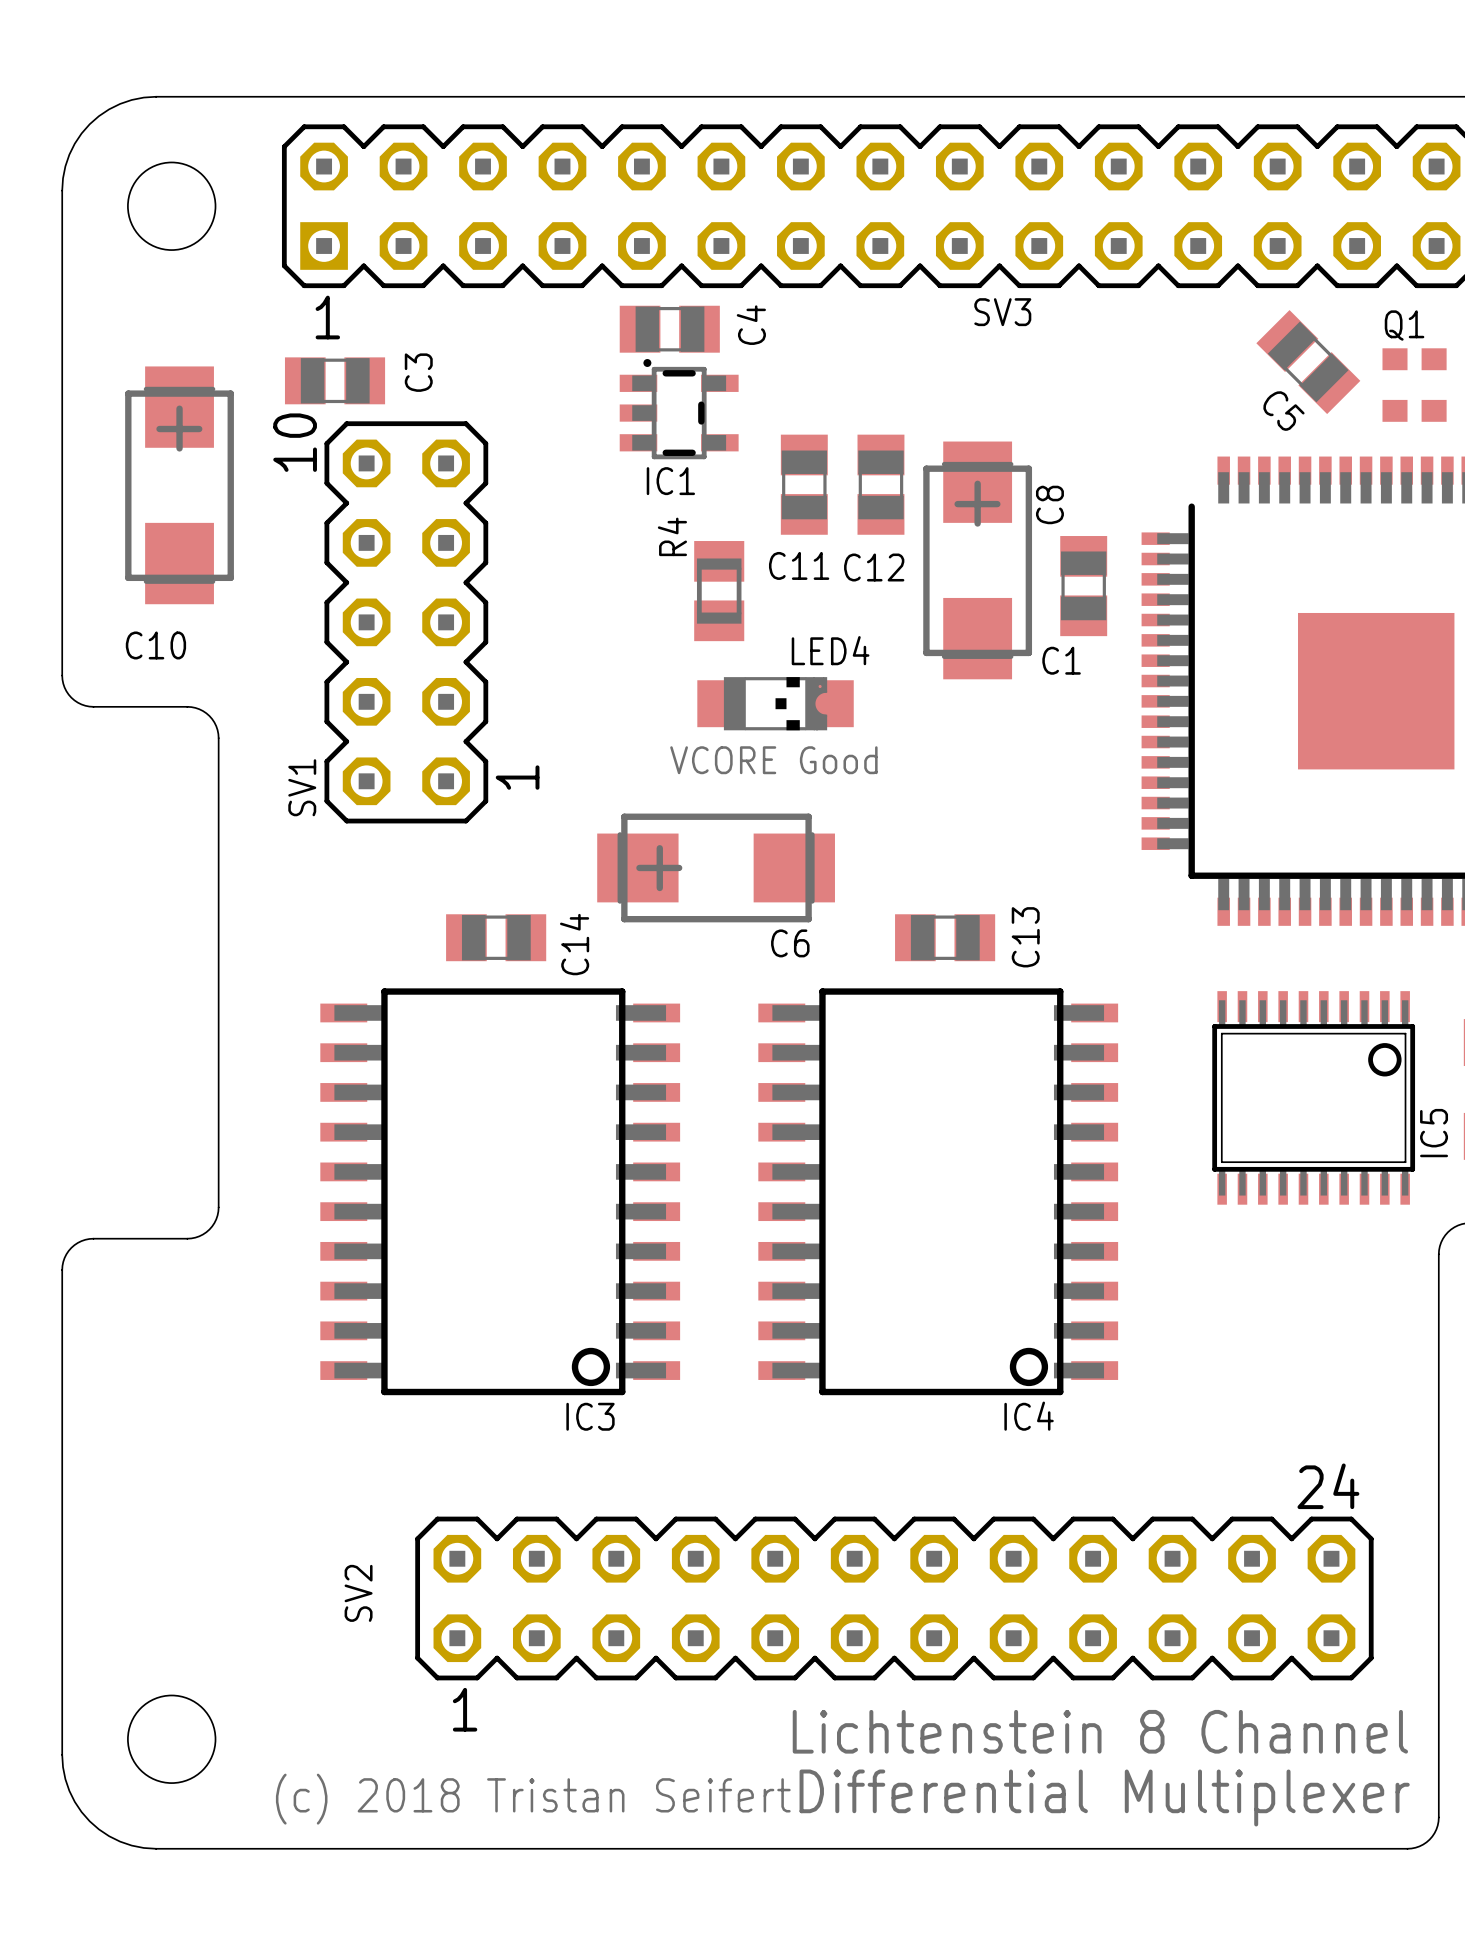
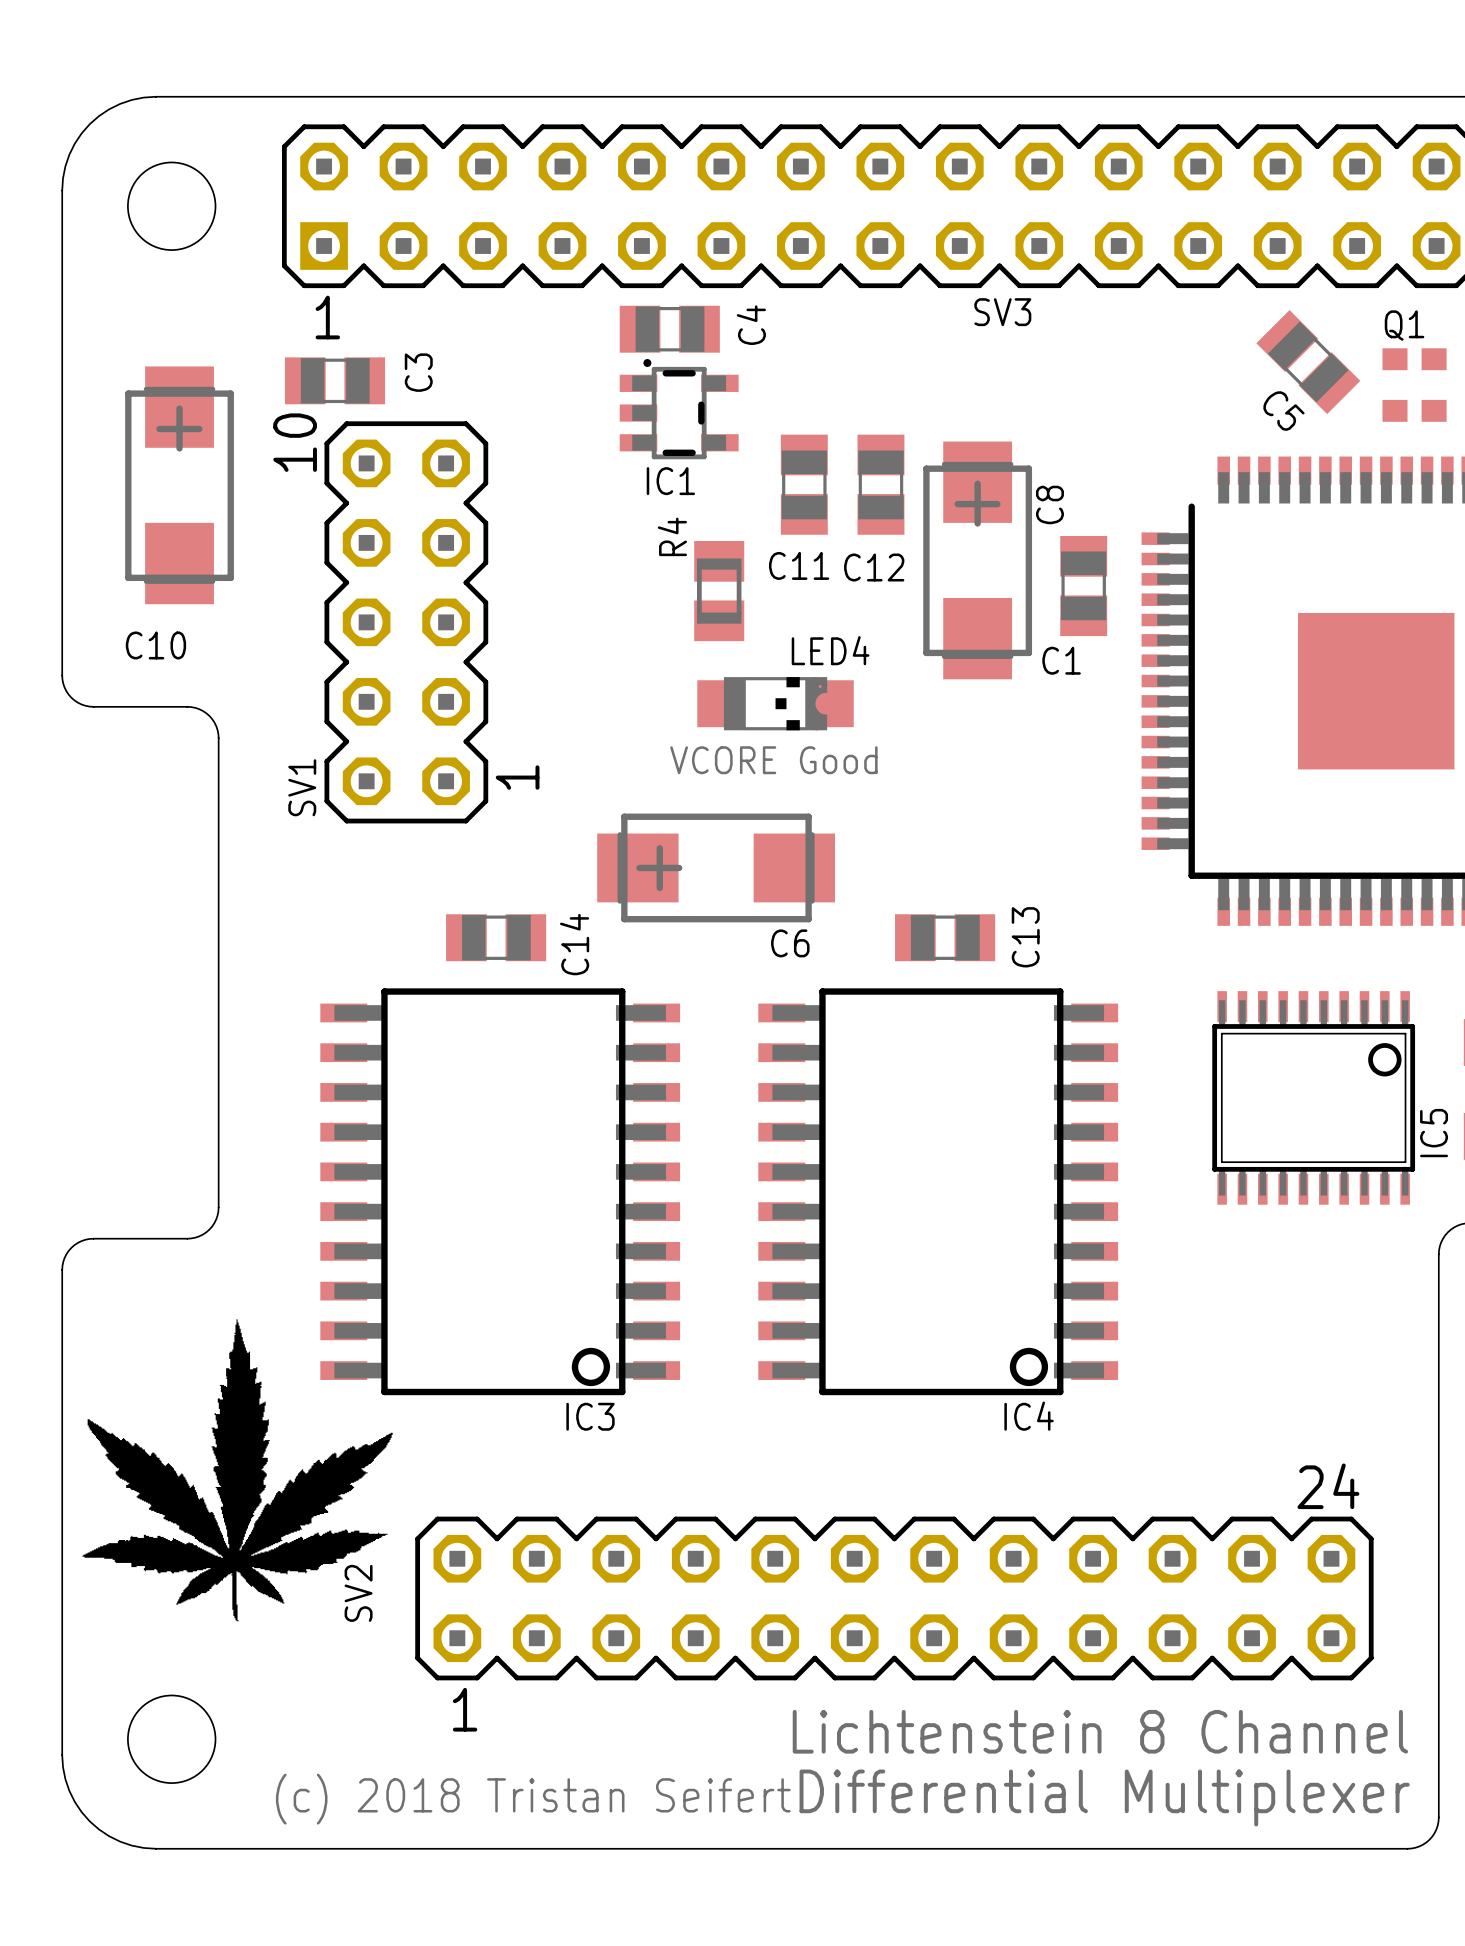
drawing: none -> [82, 1319, 393, 1622]

